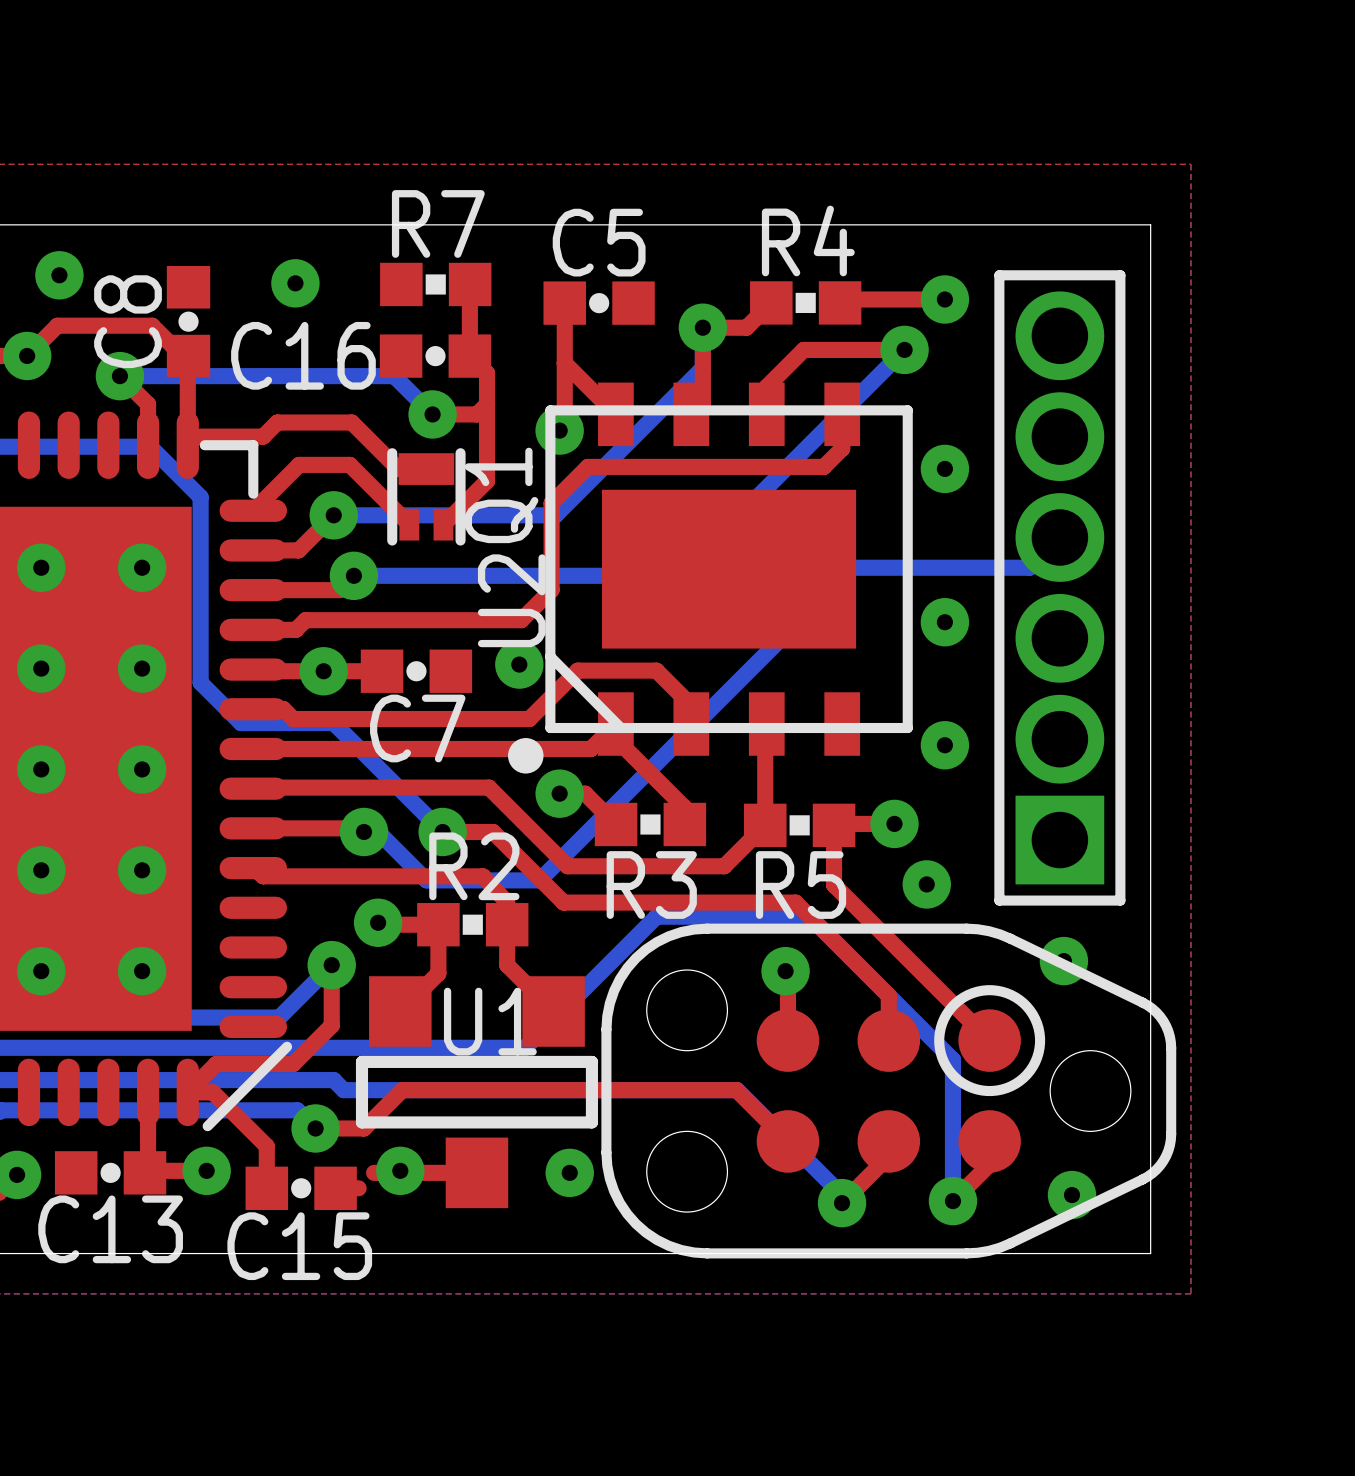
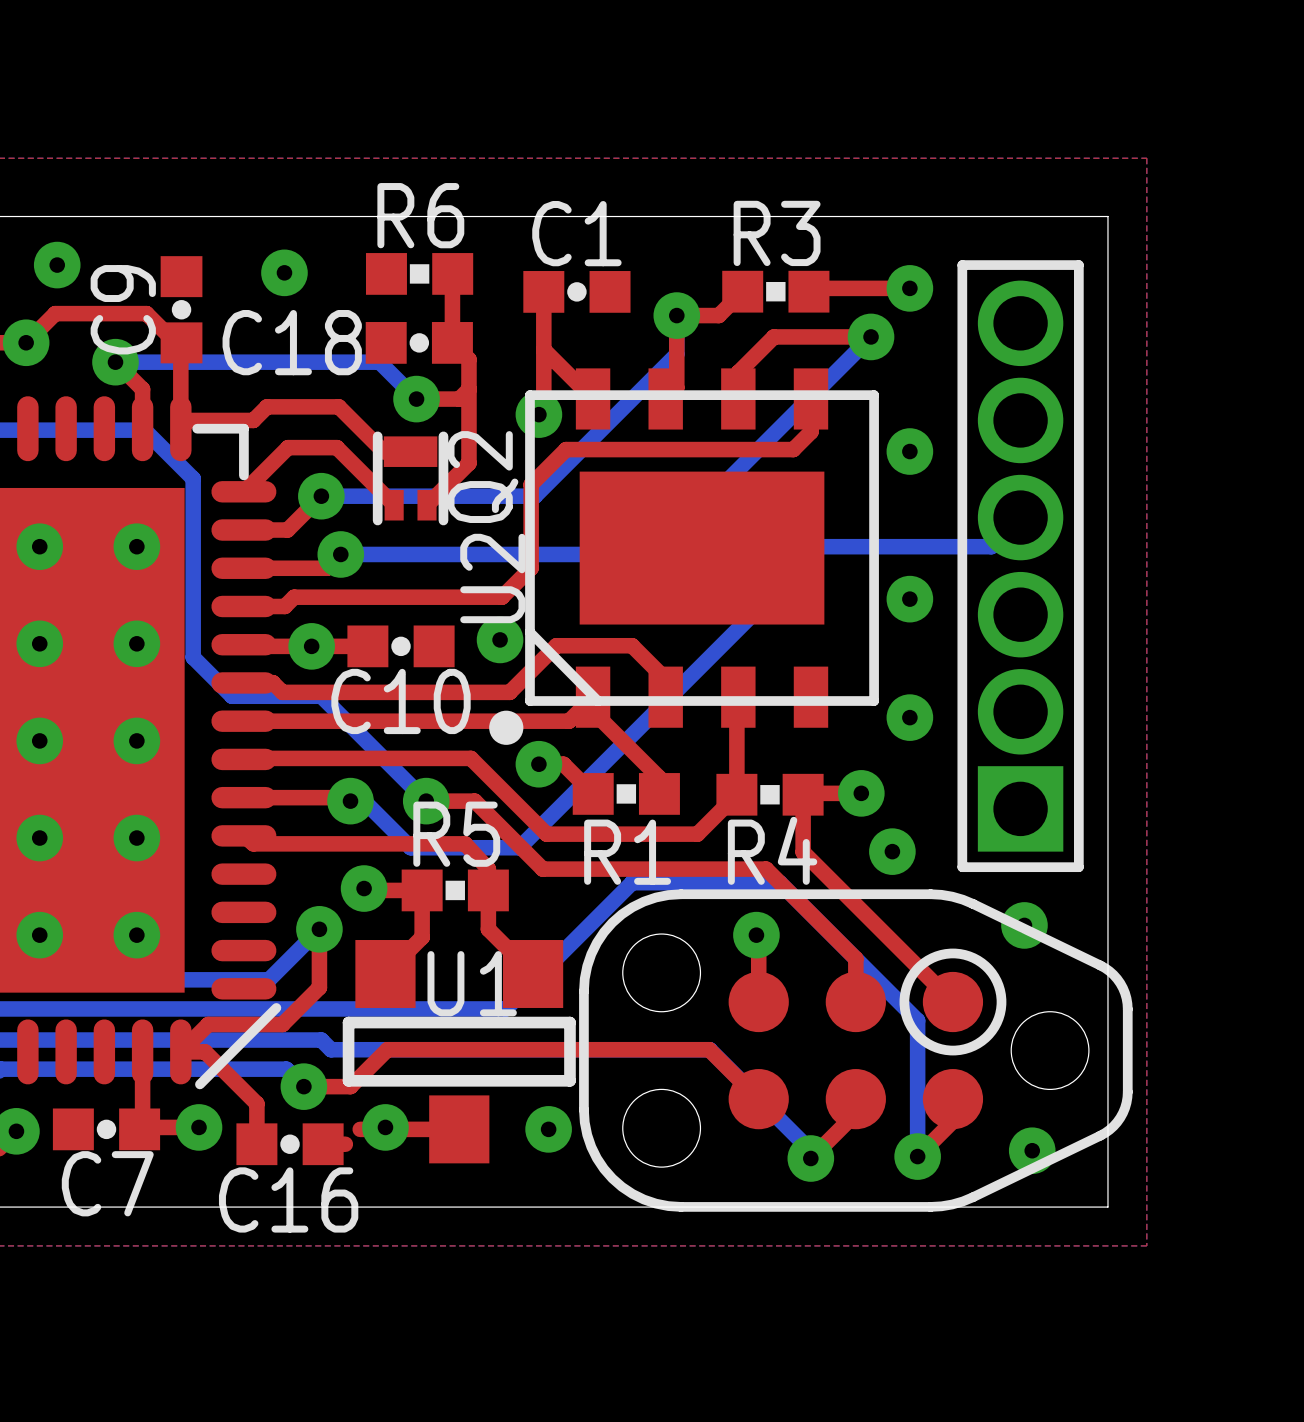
R7 name: R7 (438, 223) -> R6 (420, 215)
R4 name: R4 (808, 240) -> R3 (777, 233)
C5 name: C5 (599, 242) -> C1 (576, 233)
C8 name: C8 (128, 321) -> C9 (123, 309)
C16 name: C16 (303, 355) -> C18 (292, 342)
Q1 name: Q1 (501, 495) -> Q2 (482, 477)
C7 name: C7 (417, 728) -> C10 (401, 701)
R2 name: R2 (474, 866) -> R5 (456, 834)
R3 name: R3 (651, 885) -> R1 (627, 852)
R5 name: R5 (801, 885) -> R4 (772, 850)
C13 name: C13 (110, 1229) -> C7 (107, 1183)
C15 name: C15 (299, 1246) -> C16 (288, 1199)

